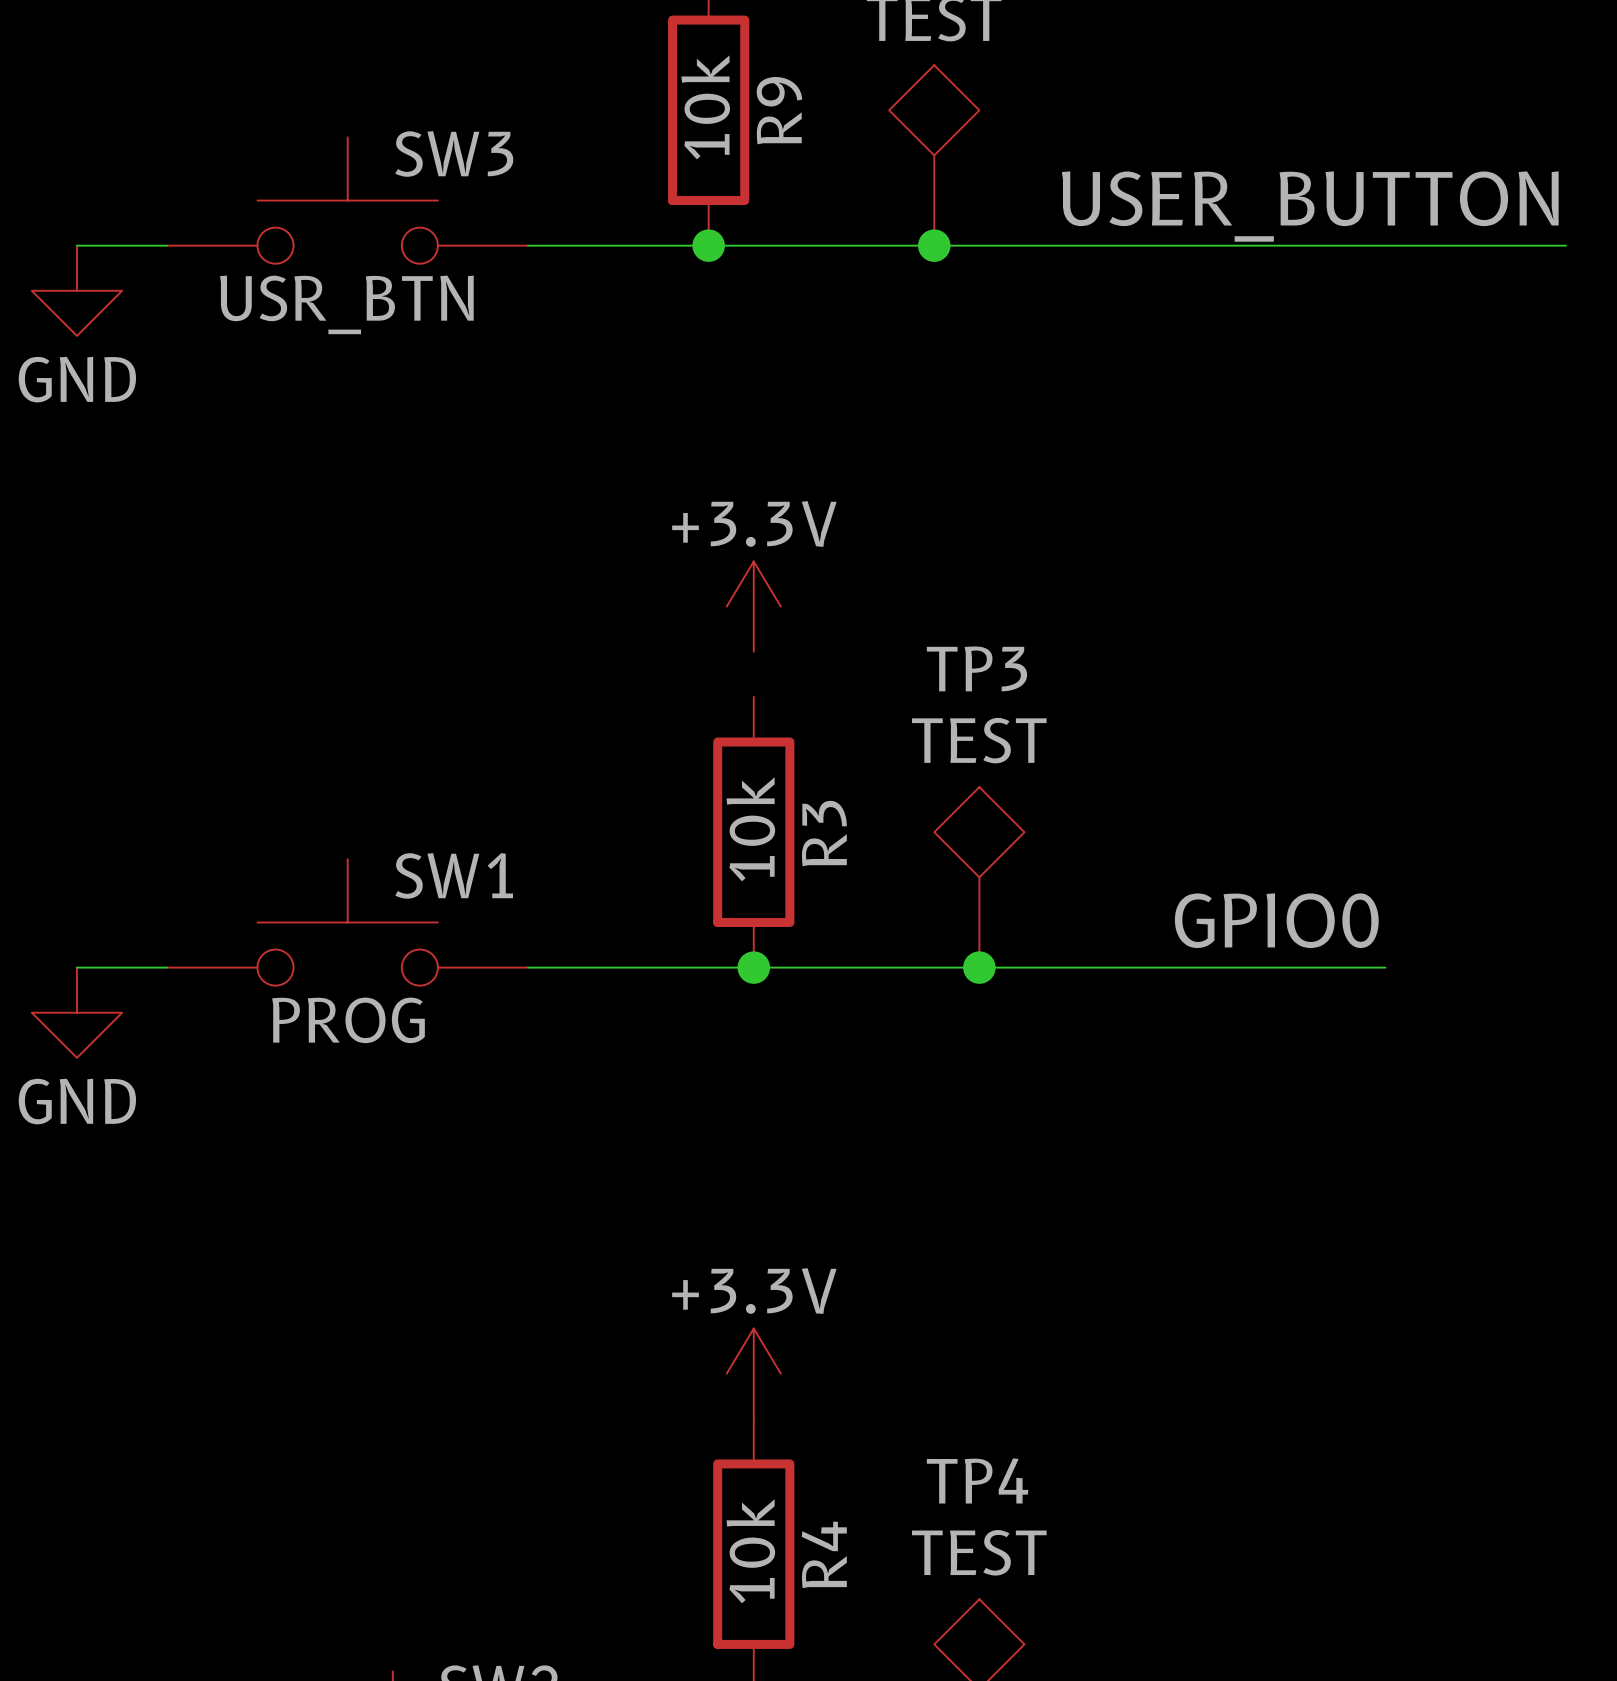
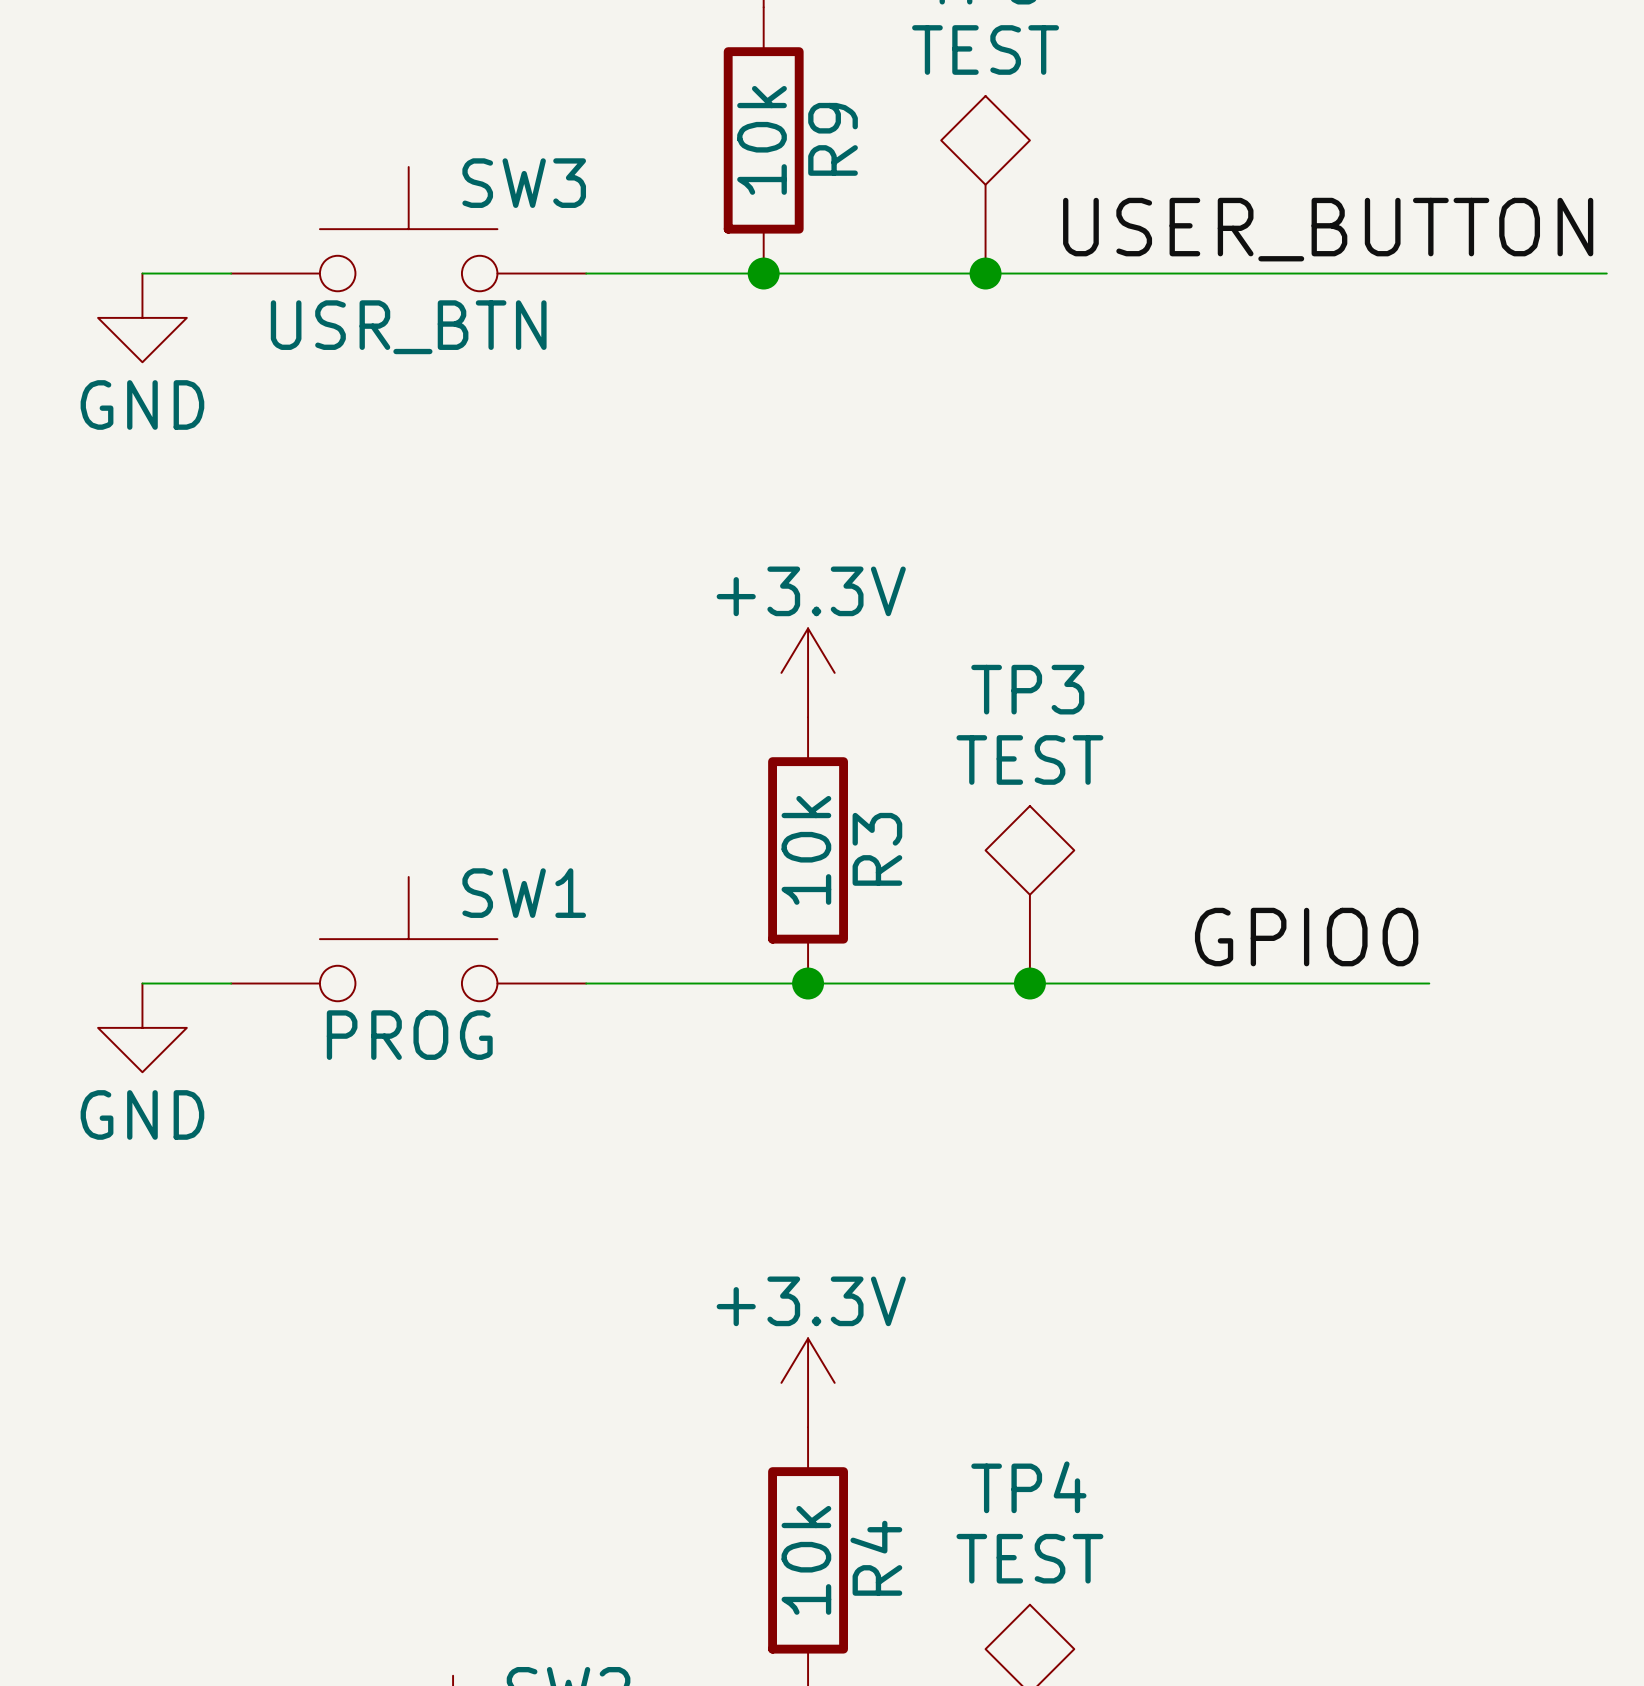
power symbol position: +3.3V (753, 606) -> +3.3V (808, 672)

